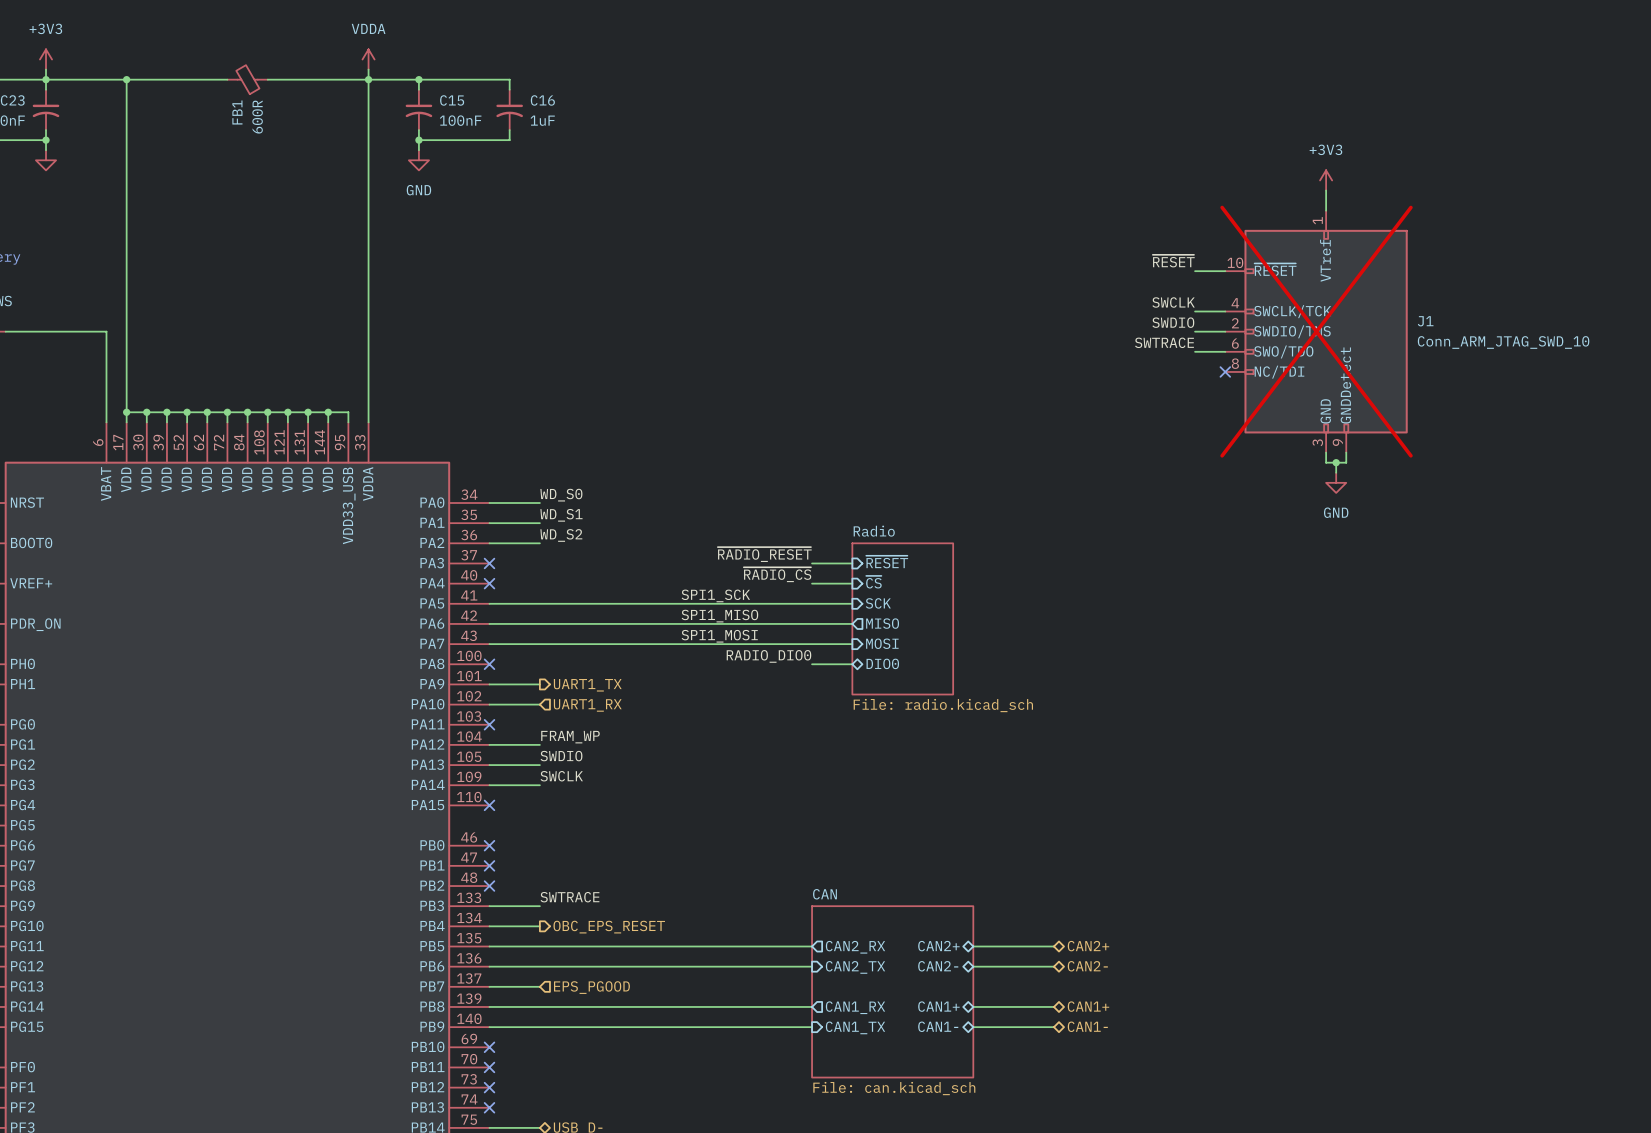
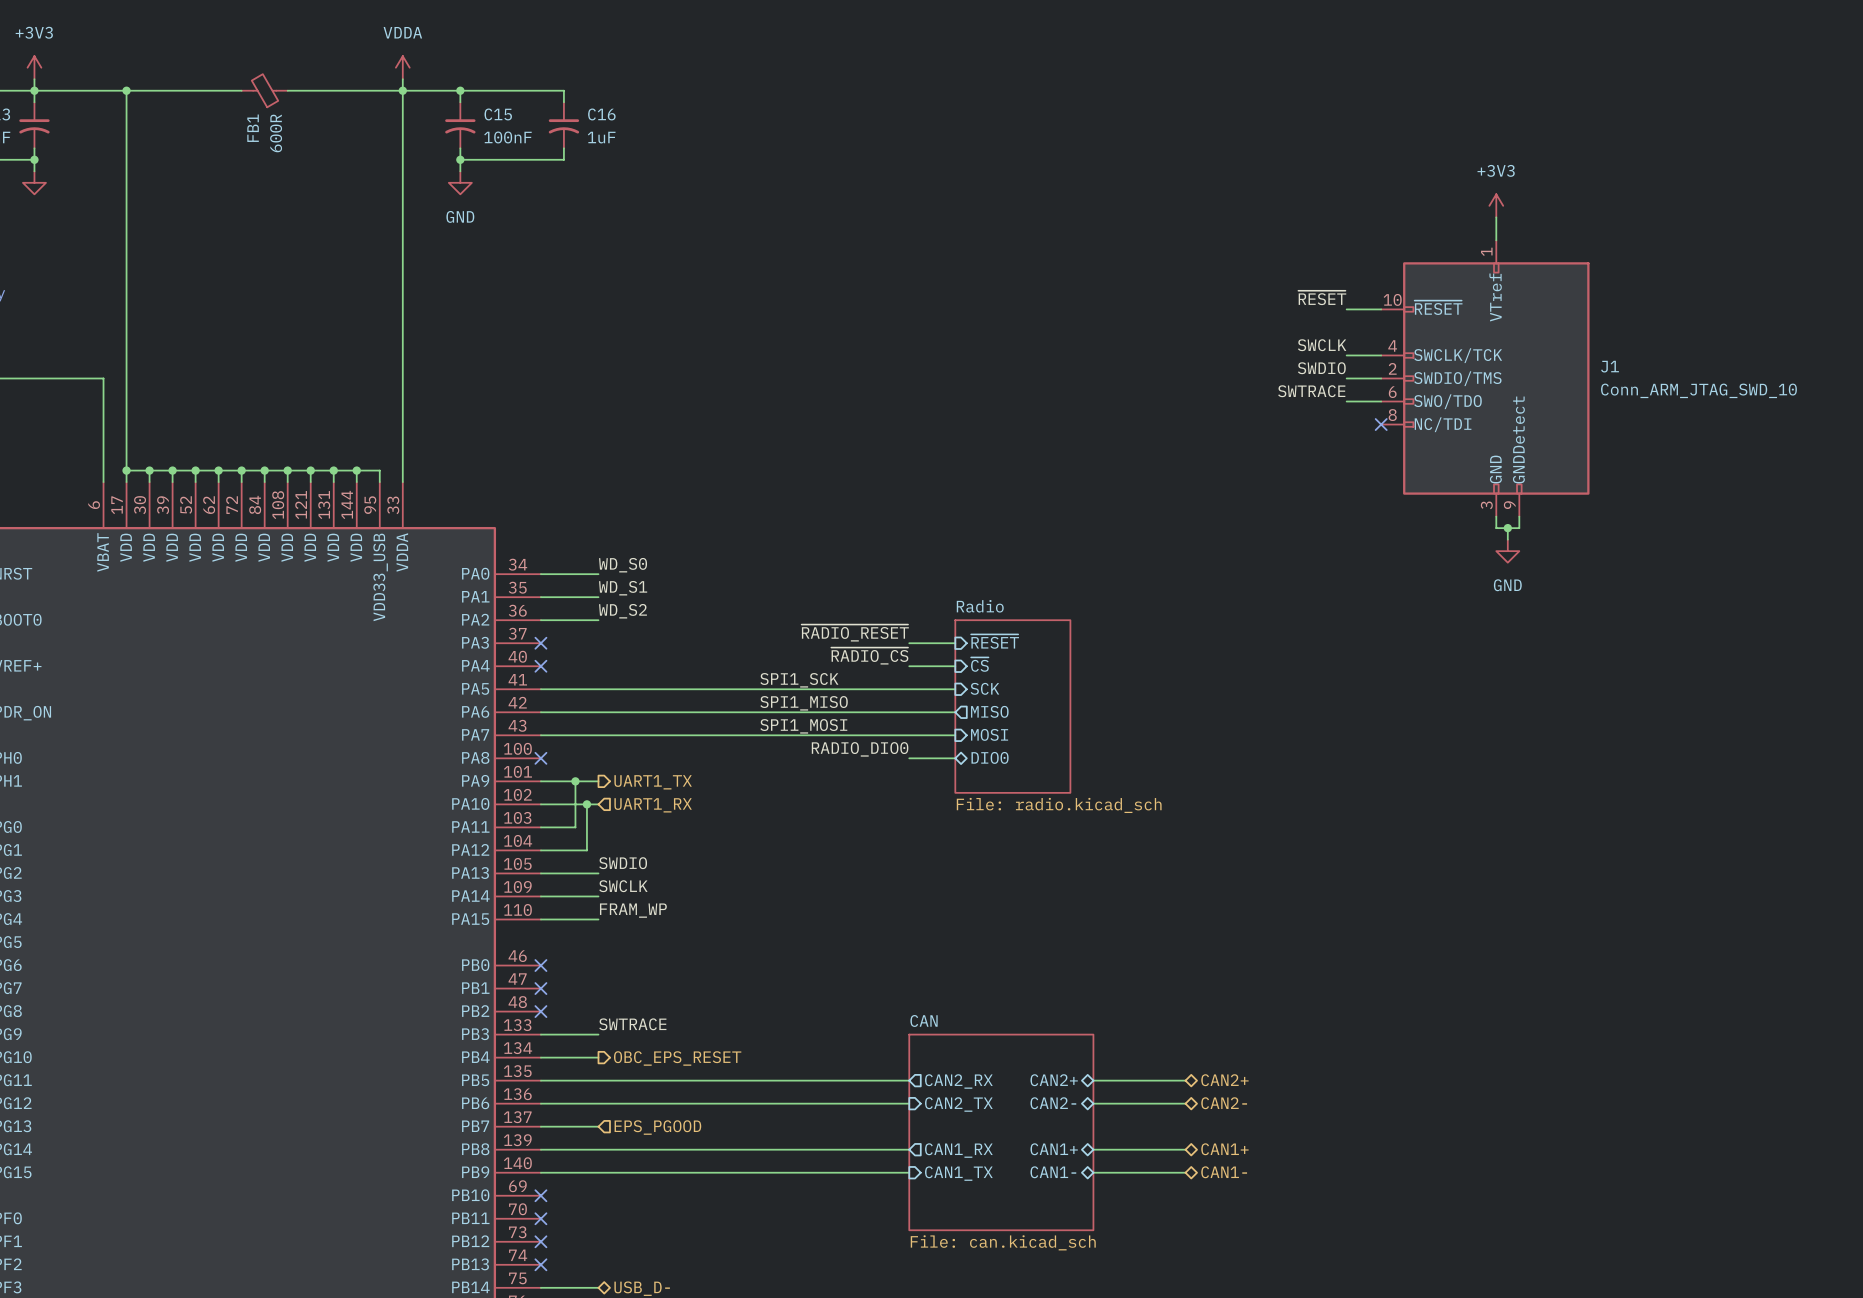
J1 do-not-place cross: (1316, 331) -> none
wire: none -> (575, 781) (575, 827) (540, 827)
junction: none -> (575, 781)
junction: none -> (586, 804)
no-connect mark: (489, 724) -> none
label position: FRAM_WP (570, 737) -> FRAM_WP (633, 910)
wire: (529, 744) (539, 744) -> (586, 850) (586, 804)
wire: none -> (540, 919) (598, 919)
no-connect mark: (489, 805) -> none

